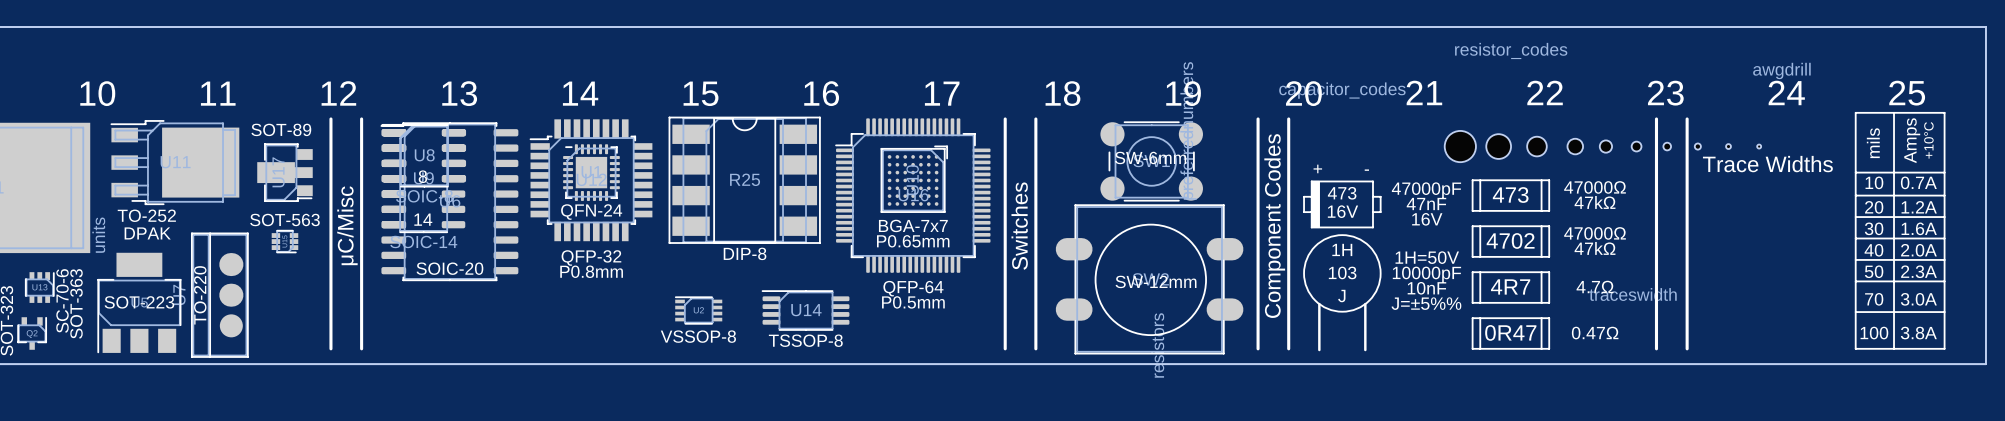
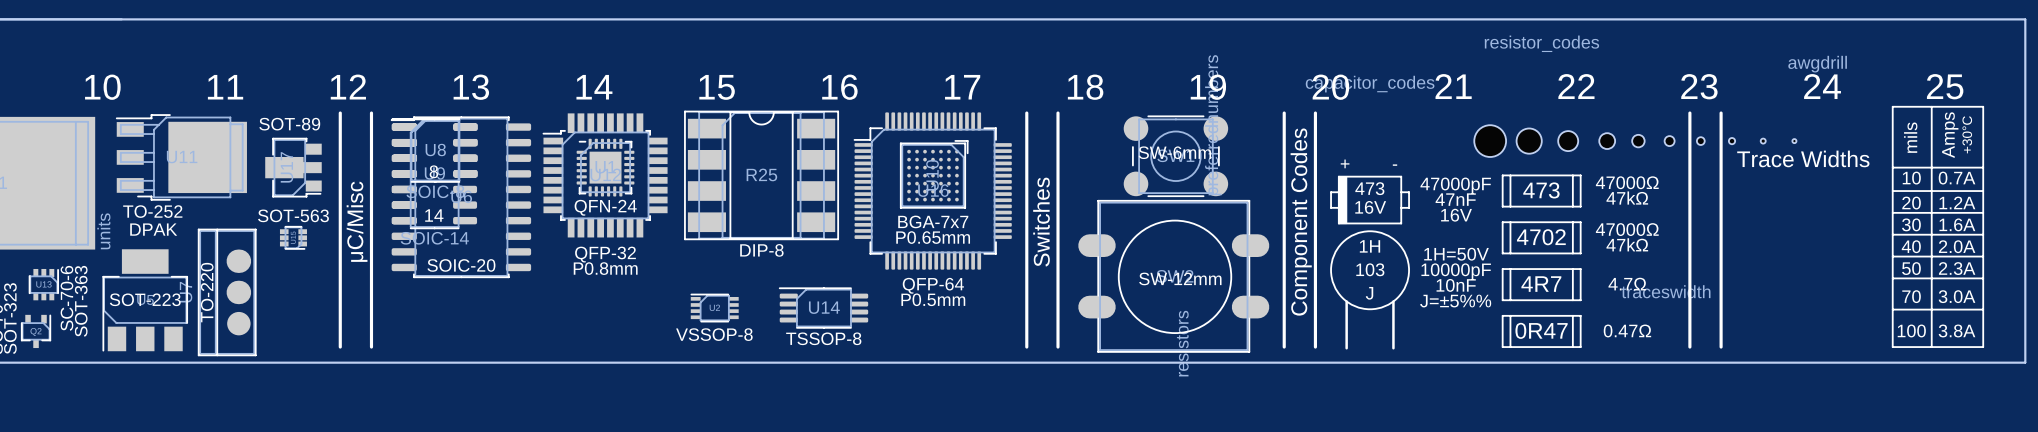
drawing shape: [1589, 112, 1946, 350] -> [1621, 106, 1984, 348]

